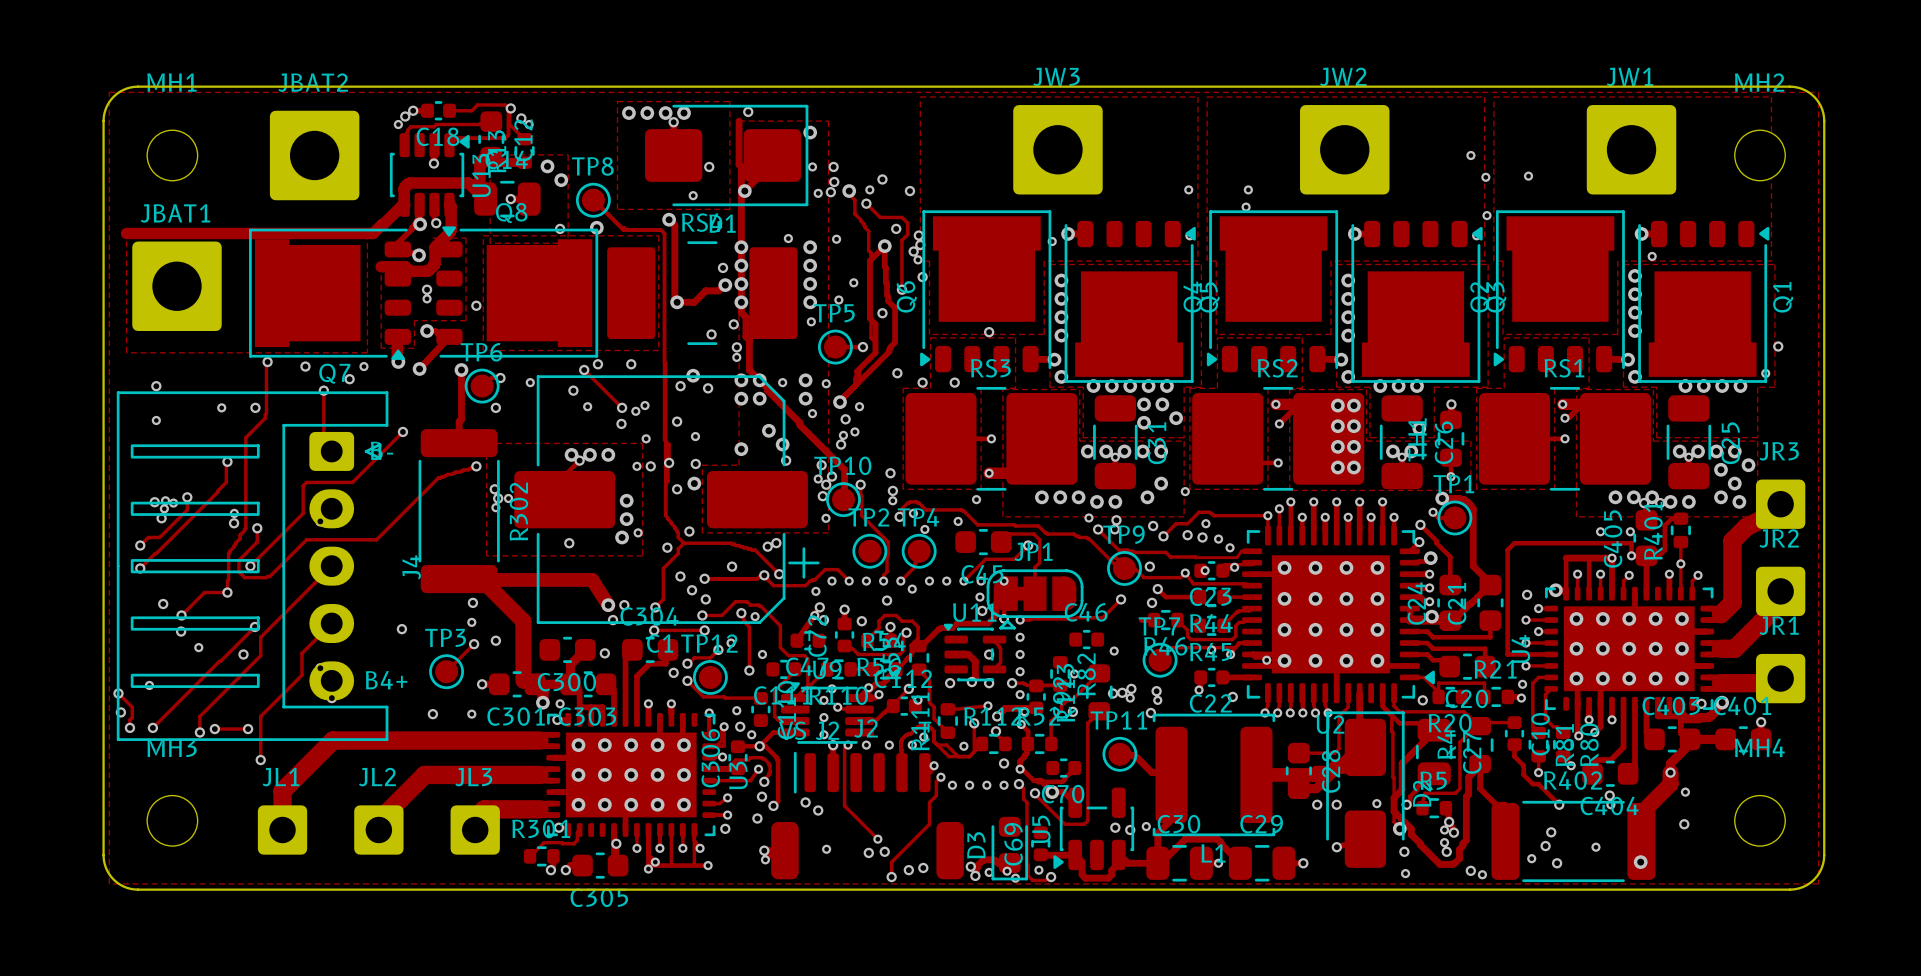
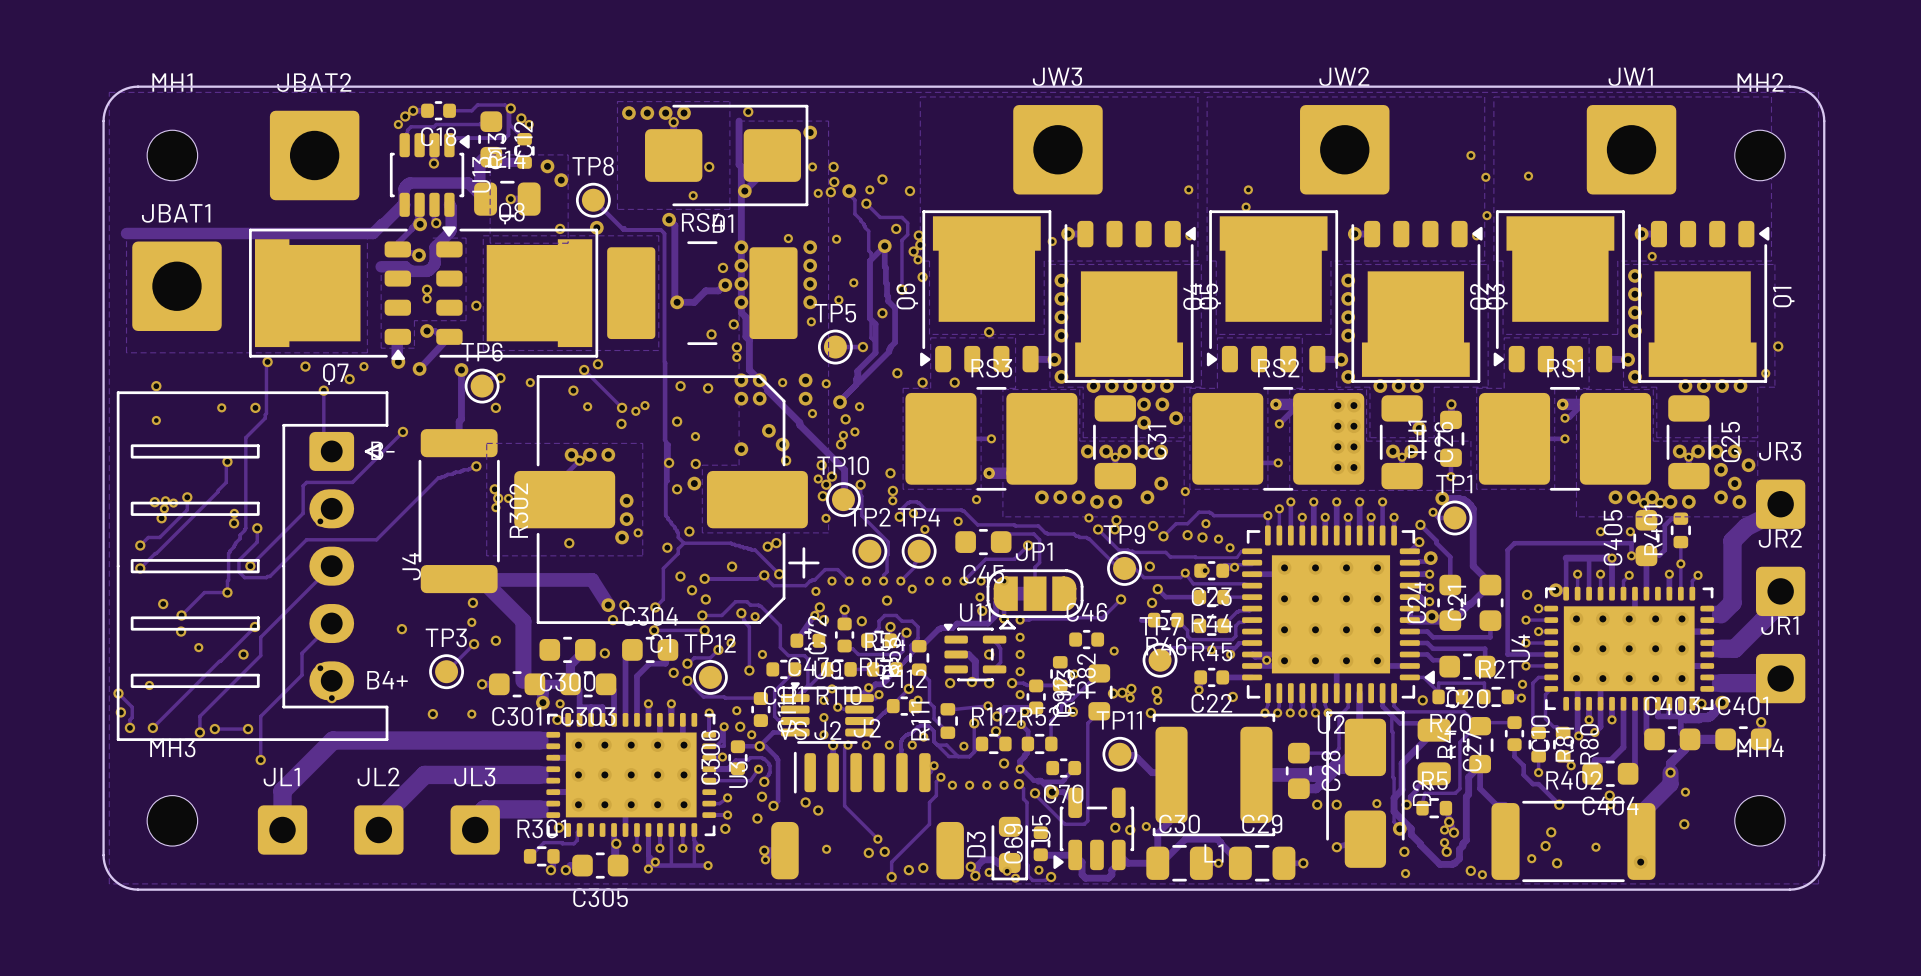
via: (631, 364) -> none
via: (693, 375) -> none
via: (646, 438) -> none
via: (636, 466) -> none
via: (650, 466) -> none

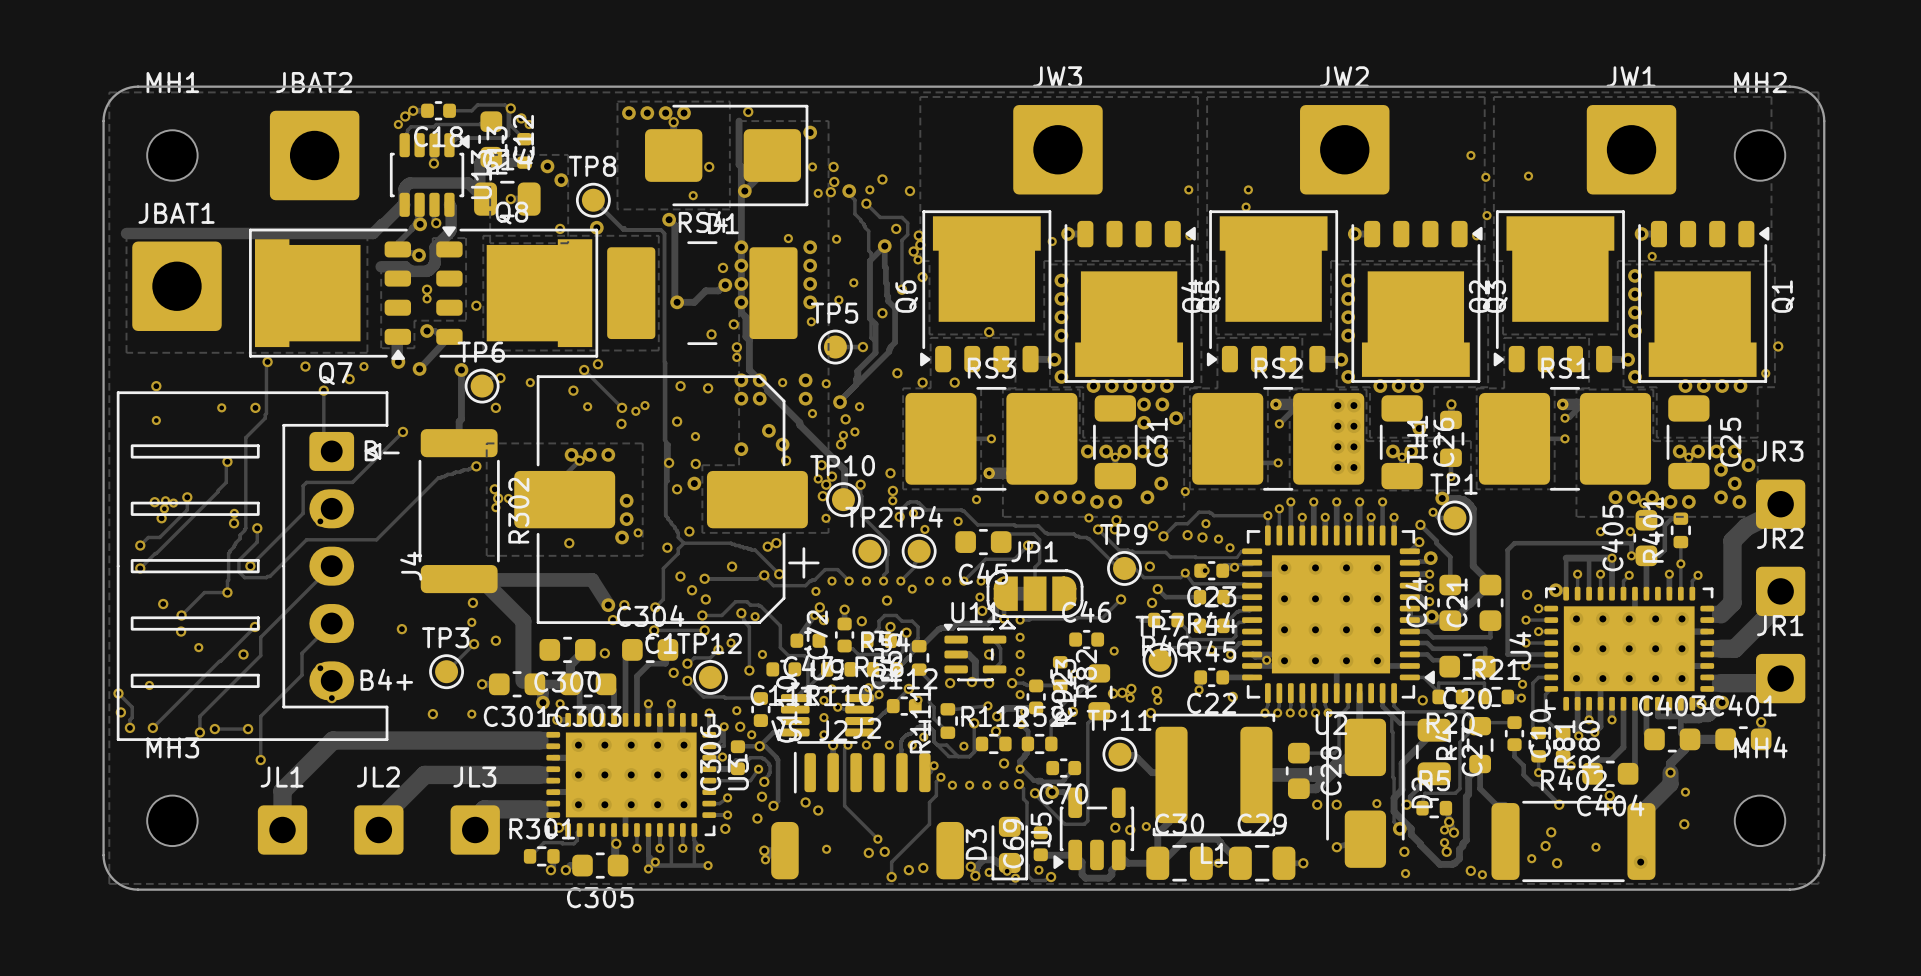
track: (794, 669) (774, 691) (774, 716) (778, 719) (795, 721) -> none

